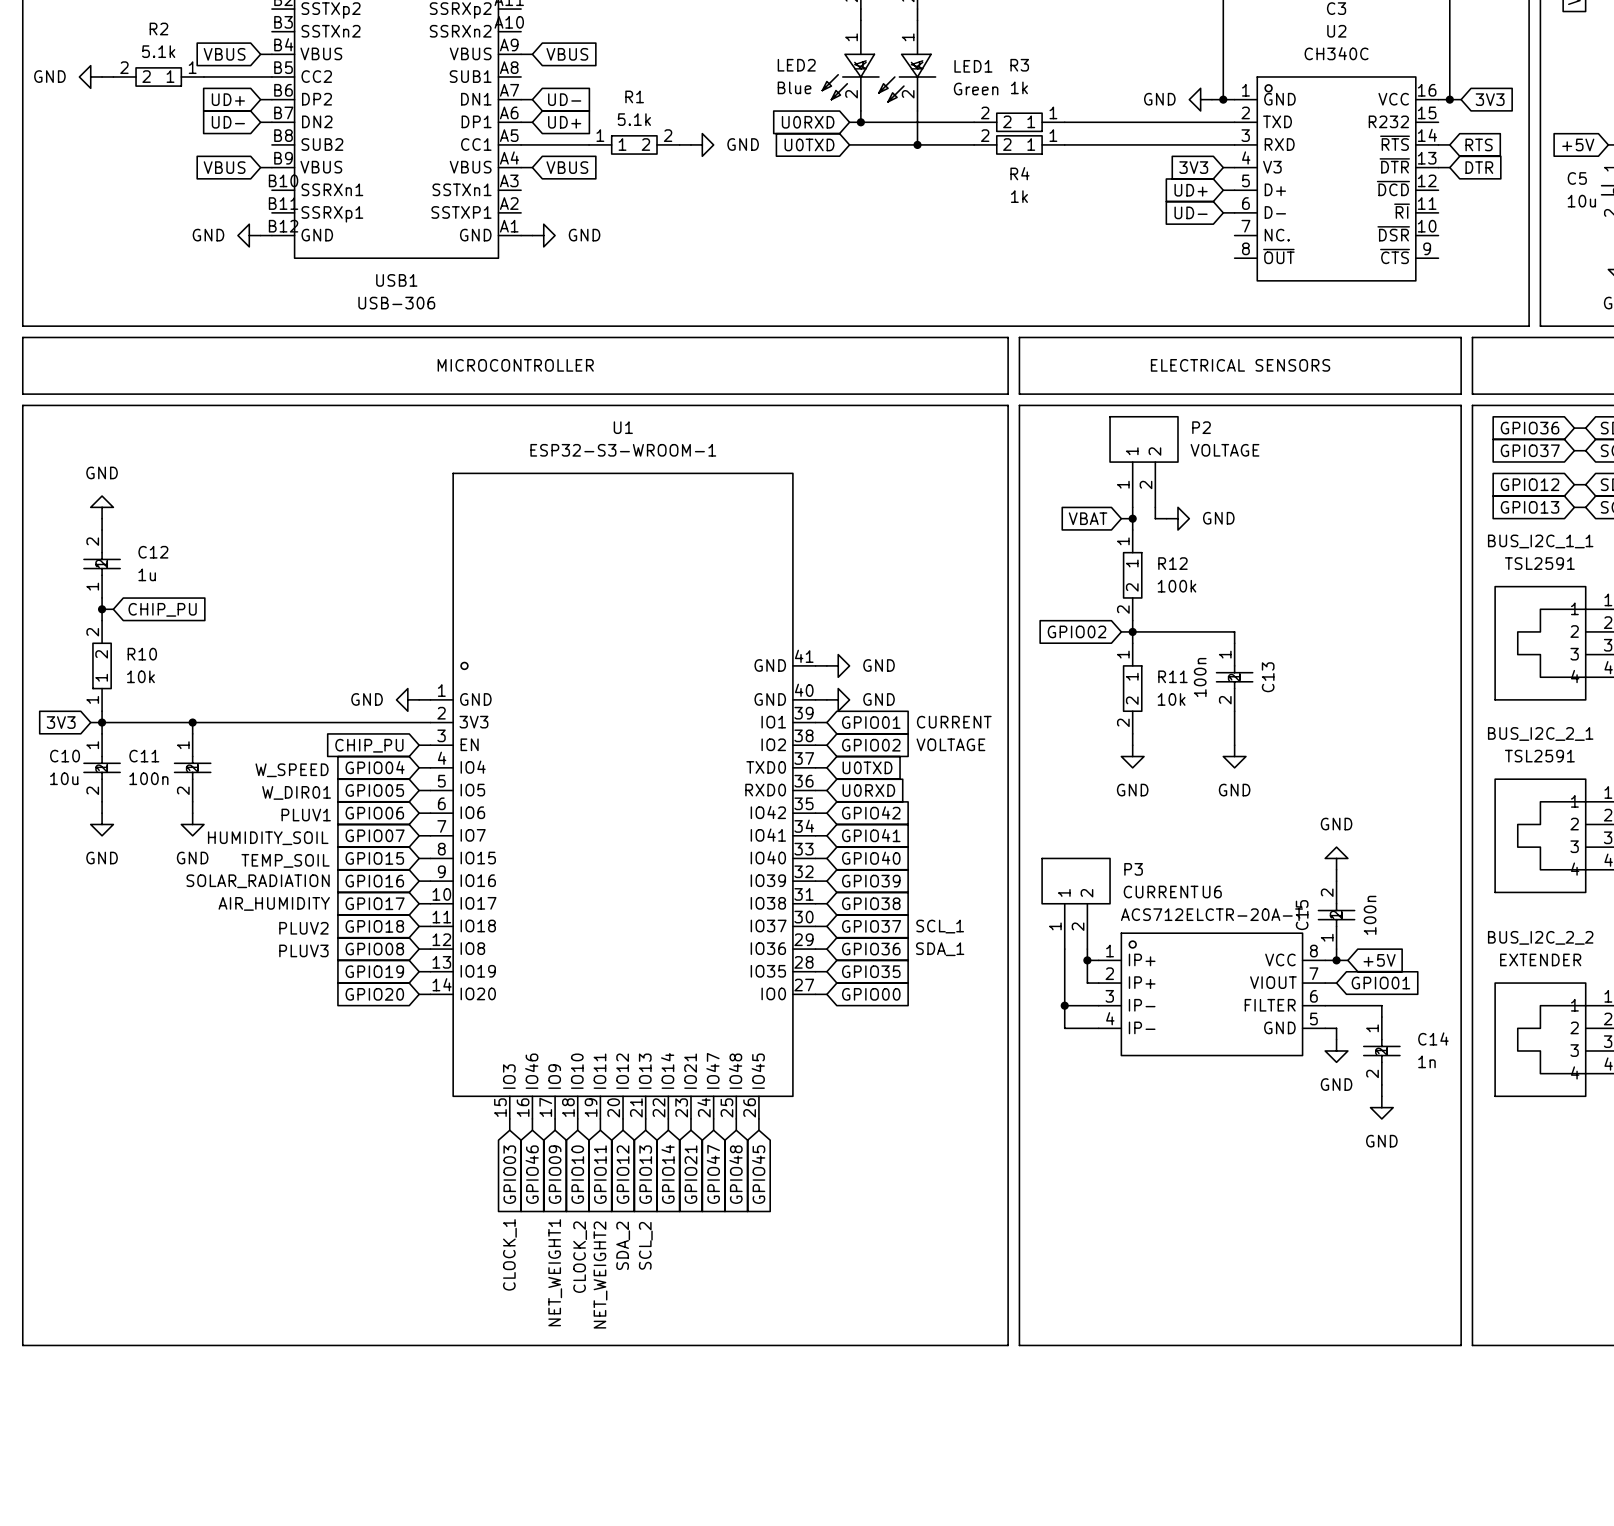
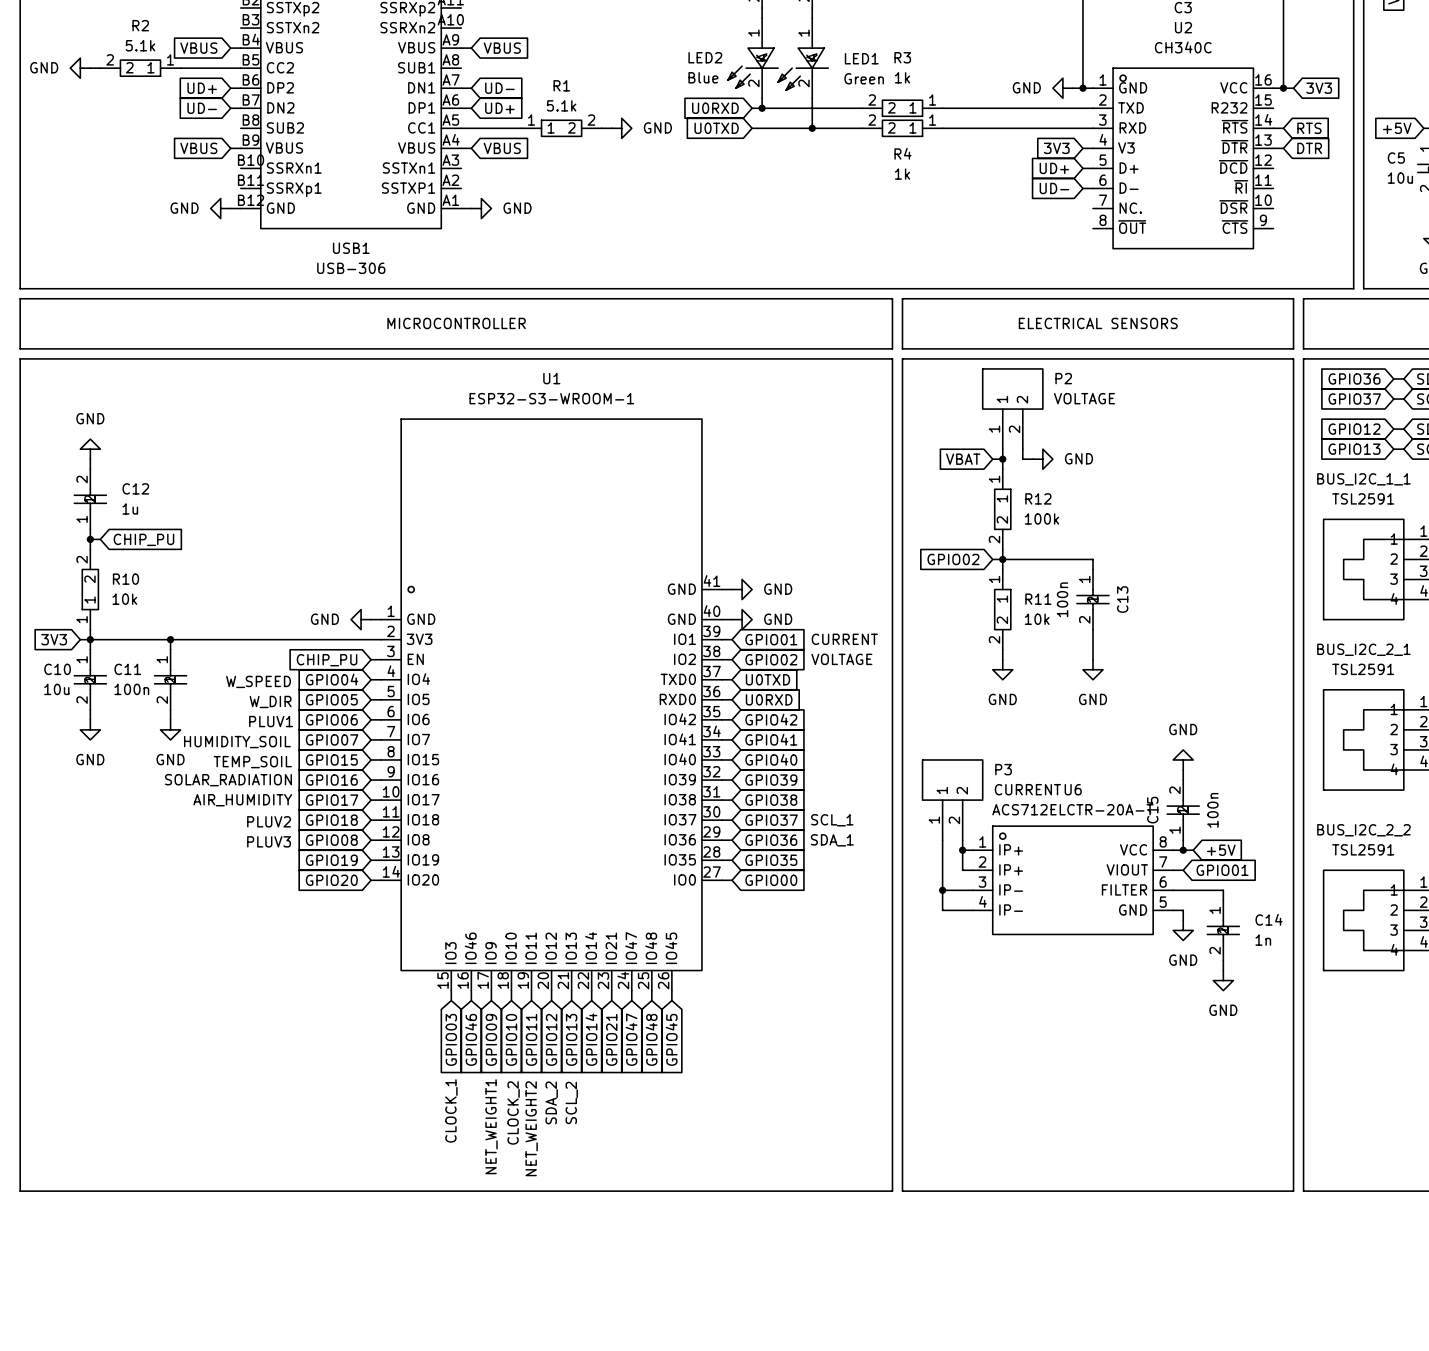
text: W_DIR01 (296, 792) -> W_DIR (270, 701)
BUS_I2C_2_2 value: EXTENDER (1540, 959) -> TSL2591 (1363, 849)

